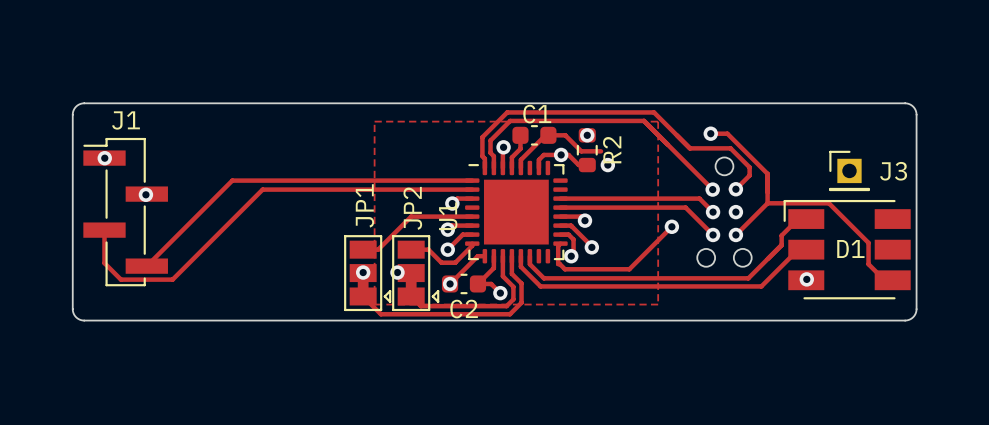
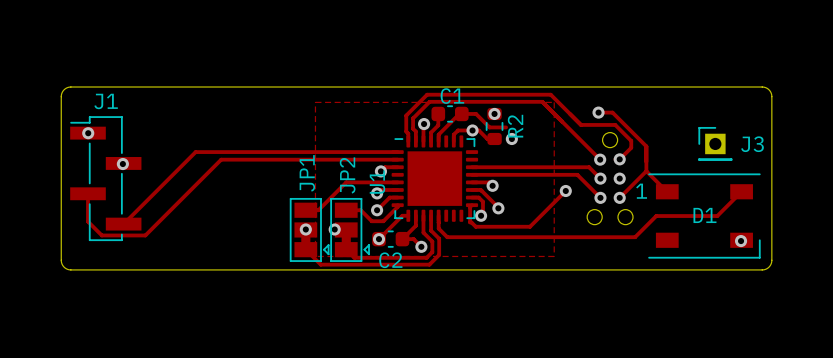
D1 footprint: [783, 199, 911, 300] -> [648, 173, 761, 259]
track: (767, 203) (828, 203) (868, 242) (868, 264) (884, 280) (892, 280) -> (646, 171) (667, 191)
track: (806, 219) (798, 219) (781, 235) (781, 245) (748, 278) (543, 278) (529, 264) (529, 256) -> none
track: (806, 249) (798, 249) (761, 286) (540, 286) (520, 266) -> (741, 191) (717, 216) (656, 216) (635, 237) (447, 237) (438, 228) (438, 224)
via position: (806, 279) -> (741, 241)

